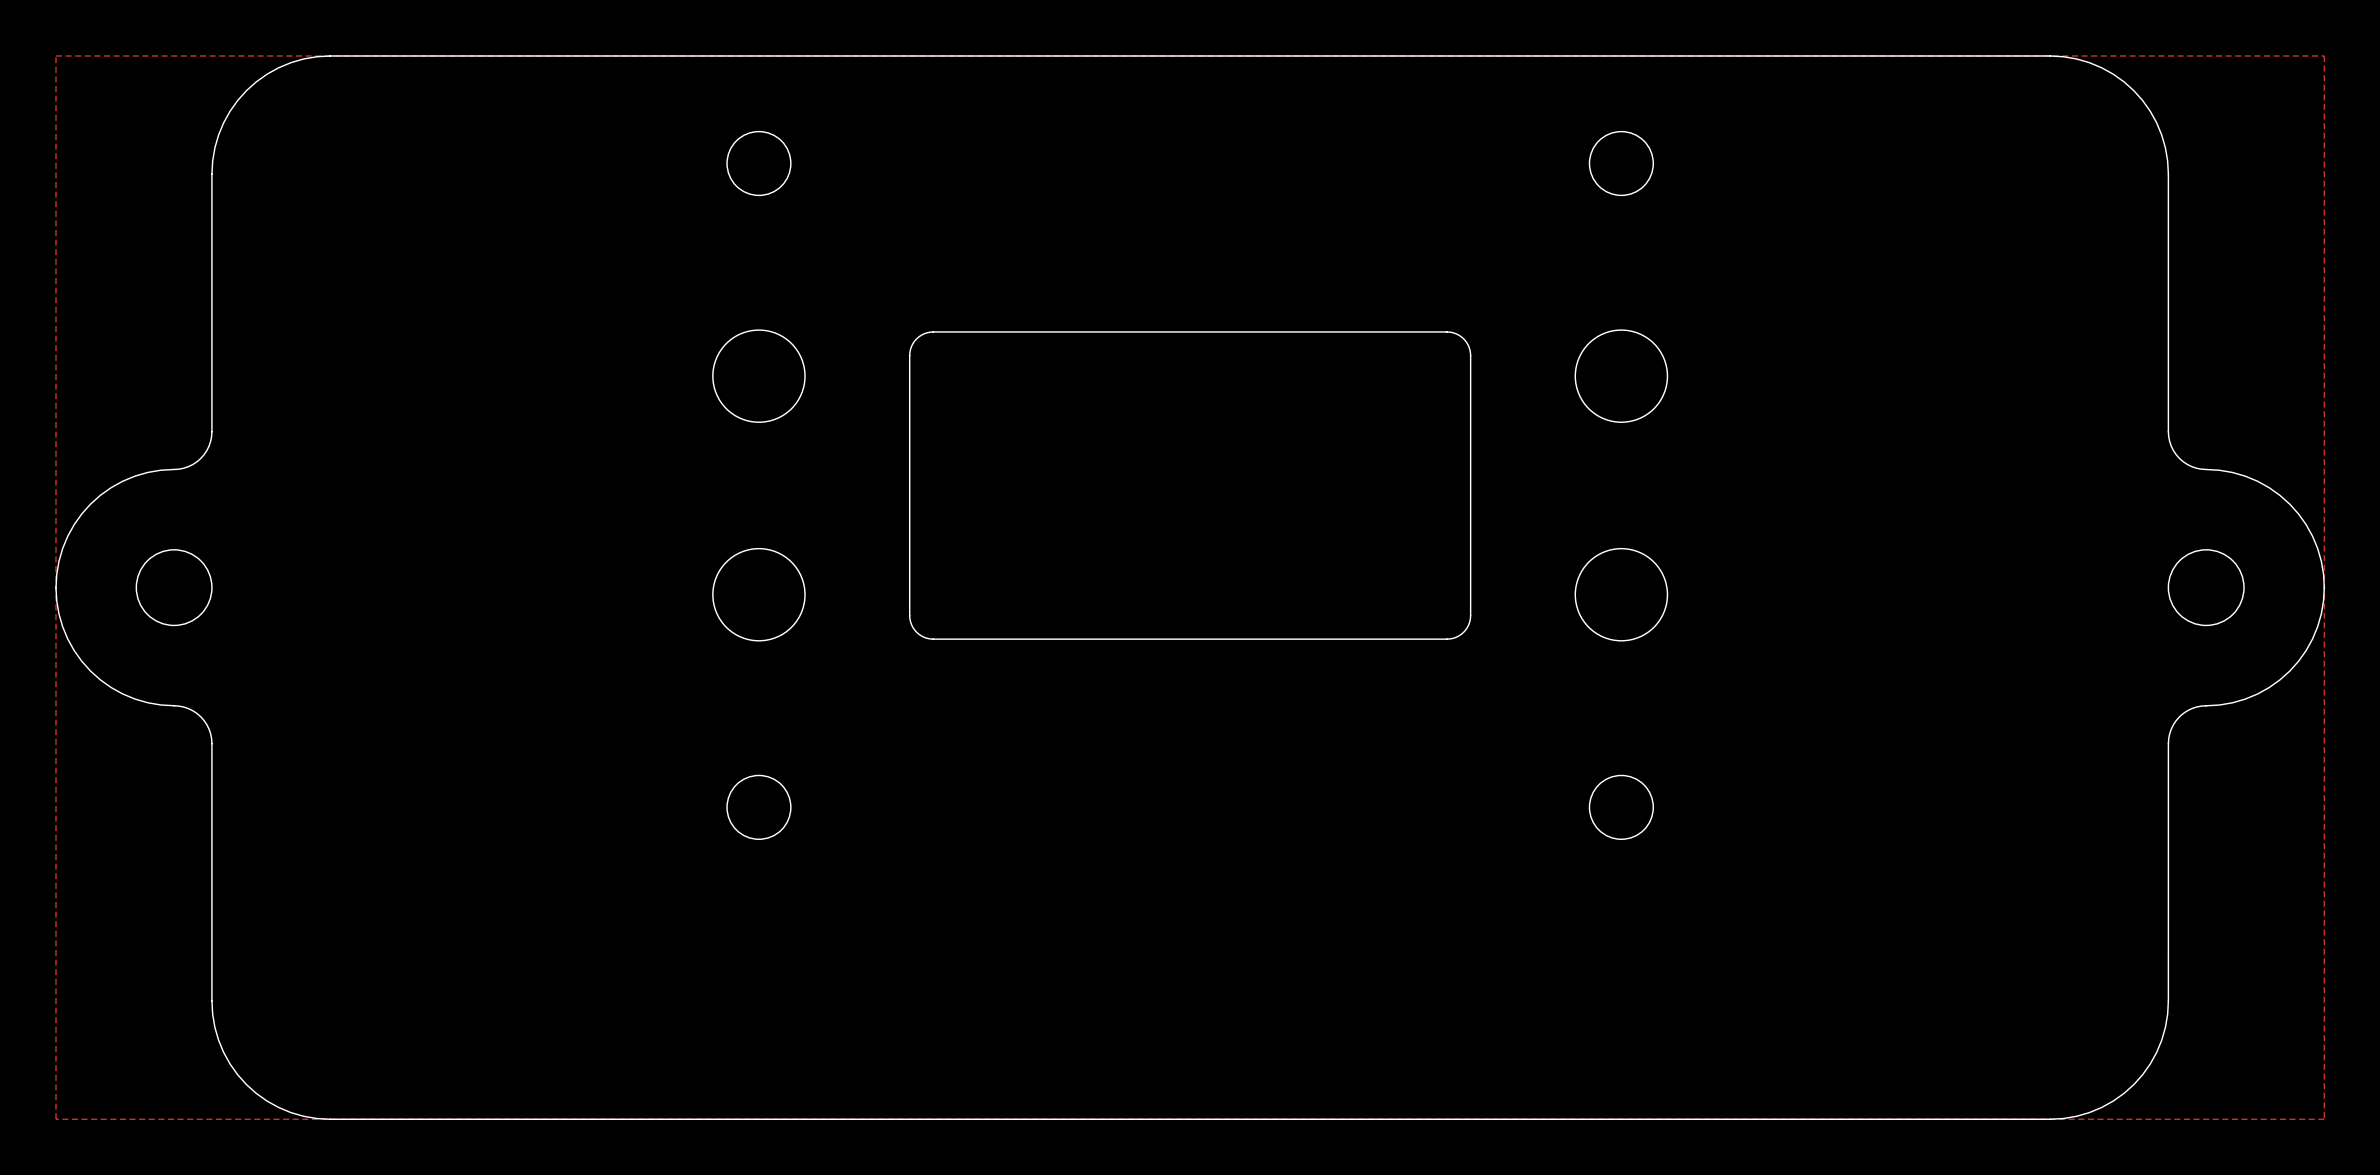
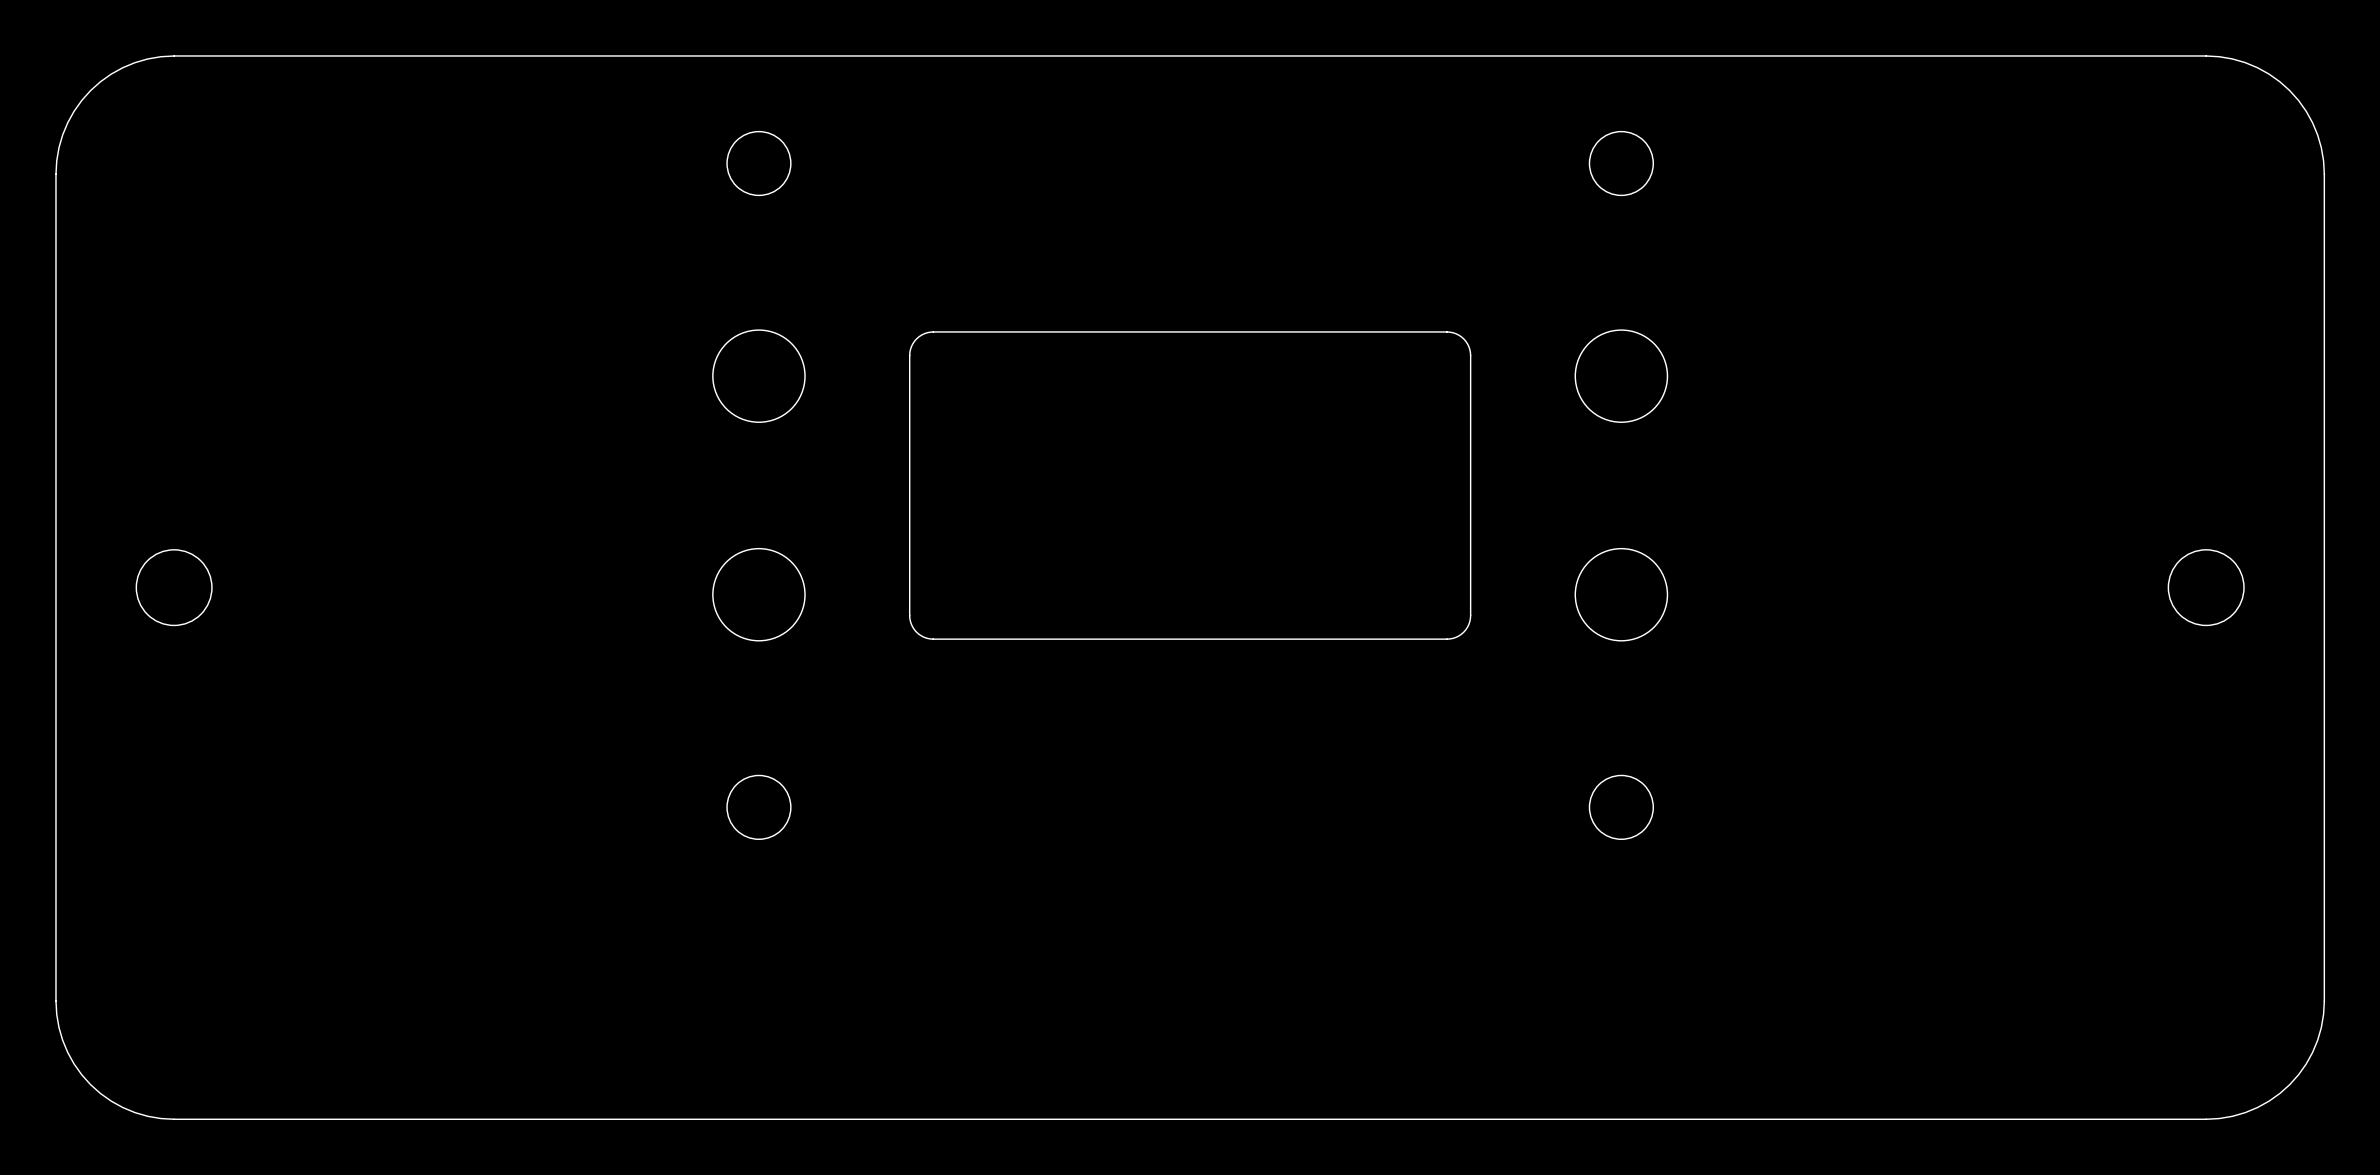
zone outline: (55, 55) (55, 1119) (2324, 1119) (2324, 55) (55, 55) -> none
board edge: (330, 55) (291, 62) (256, 81) (237, 100) (218, 135) (211, 174) (211, 431) (206, 450) (197, 461) (188, 466) (147, 472) (122, 481) (90, 504) (67, 536) (58, 561) (56, 587) (62, 626) (74, 650) (90, 671) (122, 694) (147, 702) (188, 708) (200, 716) (206, 724) (211, 743) (211, 1001) (218, 1040) (237, 1074) (256, 1093) (291, 1112) (330, 1119) -> (330, 55) (160, 56) (122, 67) (90, 90) (74, 111) (58, 147) (55, 174) (55, 1001) (62, 1040) (74, 1063) (90, 1084) (111, 1101) (135, 1112) (174, 1119) (330, 1119)
board edge: (2050, 55) (2089, 62) (2123, 81) (2142, 100) (2161, 135) (2168, 174) (2168, 431) (2173, 450) (2179, 458) (2191, 466) (2232, 472) (2257, 481) (2289, 504) (2312, 536) (2321, 561) (2324, 587) (2321, 613) (2312, 638) (2289, 671) (2257, 694) (2232, 702) (2191, 708) (2183, 713) (2173, 724) (2168, 743) (2168, 1001) (2161, 1040) (2142, 1074) (2123, 1093) (2089, 1112) (2050, 1119) -> (2050, 55) (2219, 56) (2257, 67) (2289, 90) (2306, 111) (2321, 147) (2324, 174) (2324, 1001) (2317, 1040) (2306, 1063) (2289, 1084) (2269, 1101) (2245, 1112) (2206, 1119) (2050, 1119)

